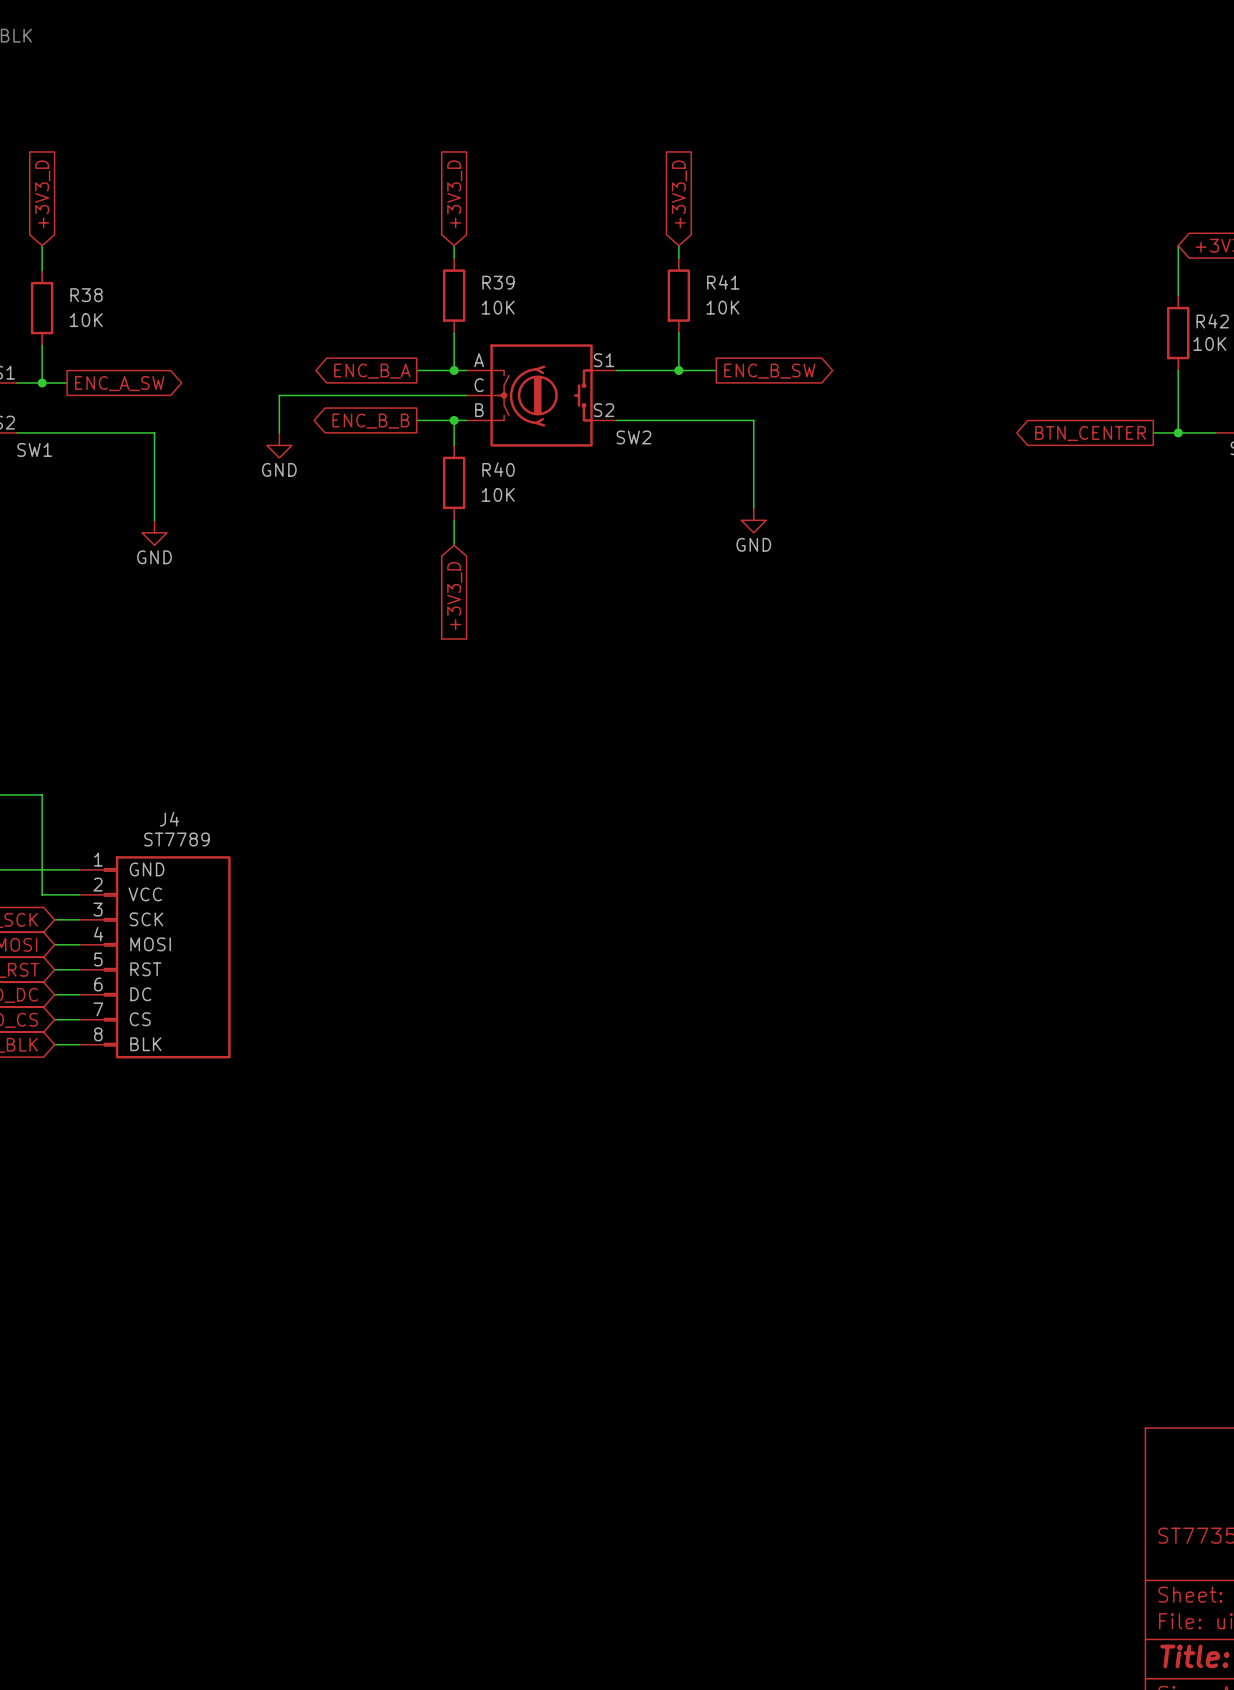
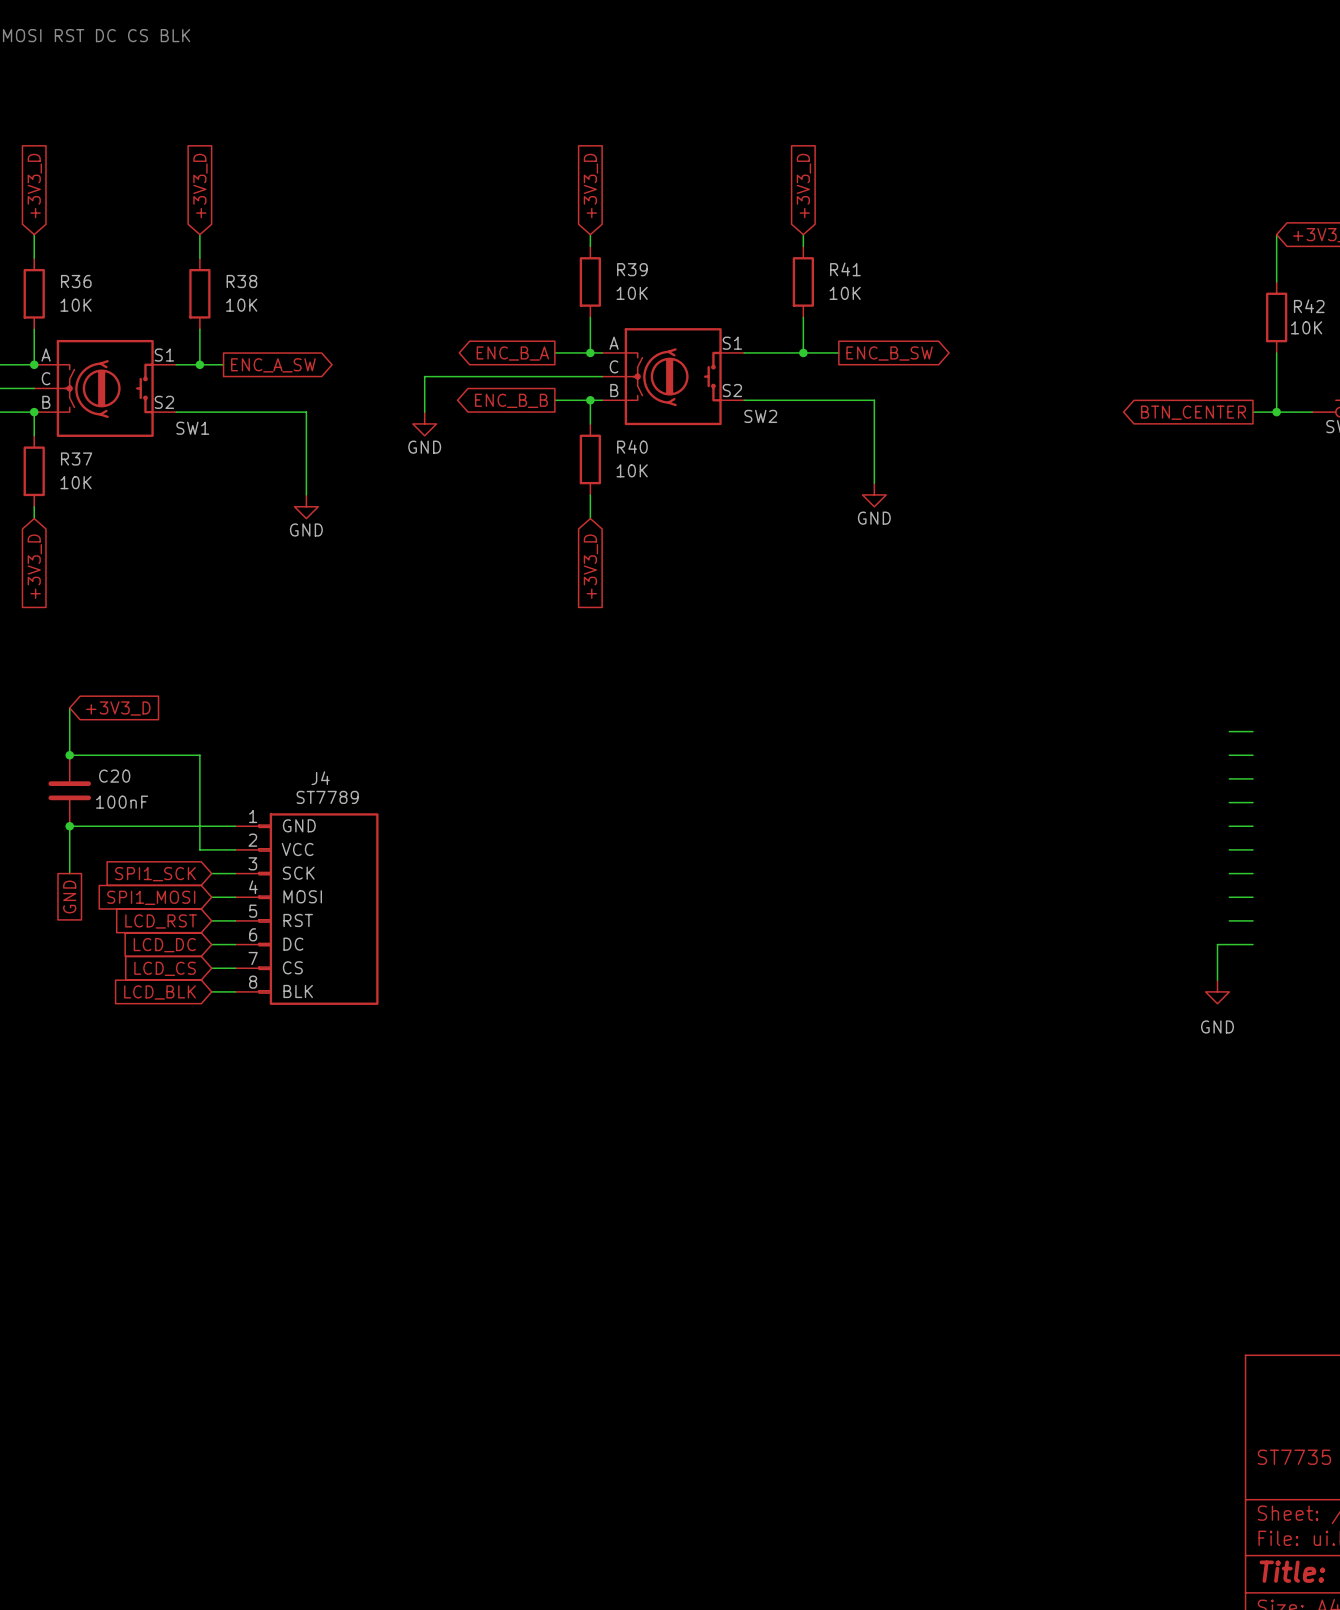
wire: none -> (1229, 731) (1252, 731)
wire: none -> (1229, 755) (1252, 755)
wire: none -> (1229, 778) (1252, 778)
wire: none -> (1229, 802) (1252, 802)
wire: none -> (1229, 826) (1252, 826)
wire: none -> (1229, 849) (1252, 849)
wire: none -> (1229, 873) (1252, 873)
wire: none -> (1229, 897) (1252, 897)
wire: none -> (1229, 920) (1252, 920)
wire: none -> (1252, 944) (1217, 944) (1217, 980)
power symbol: none -> GND (1217, 991)

